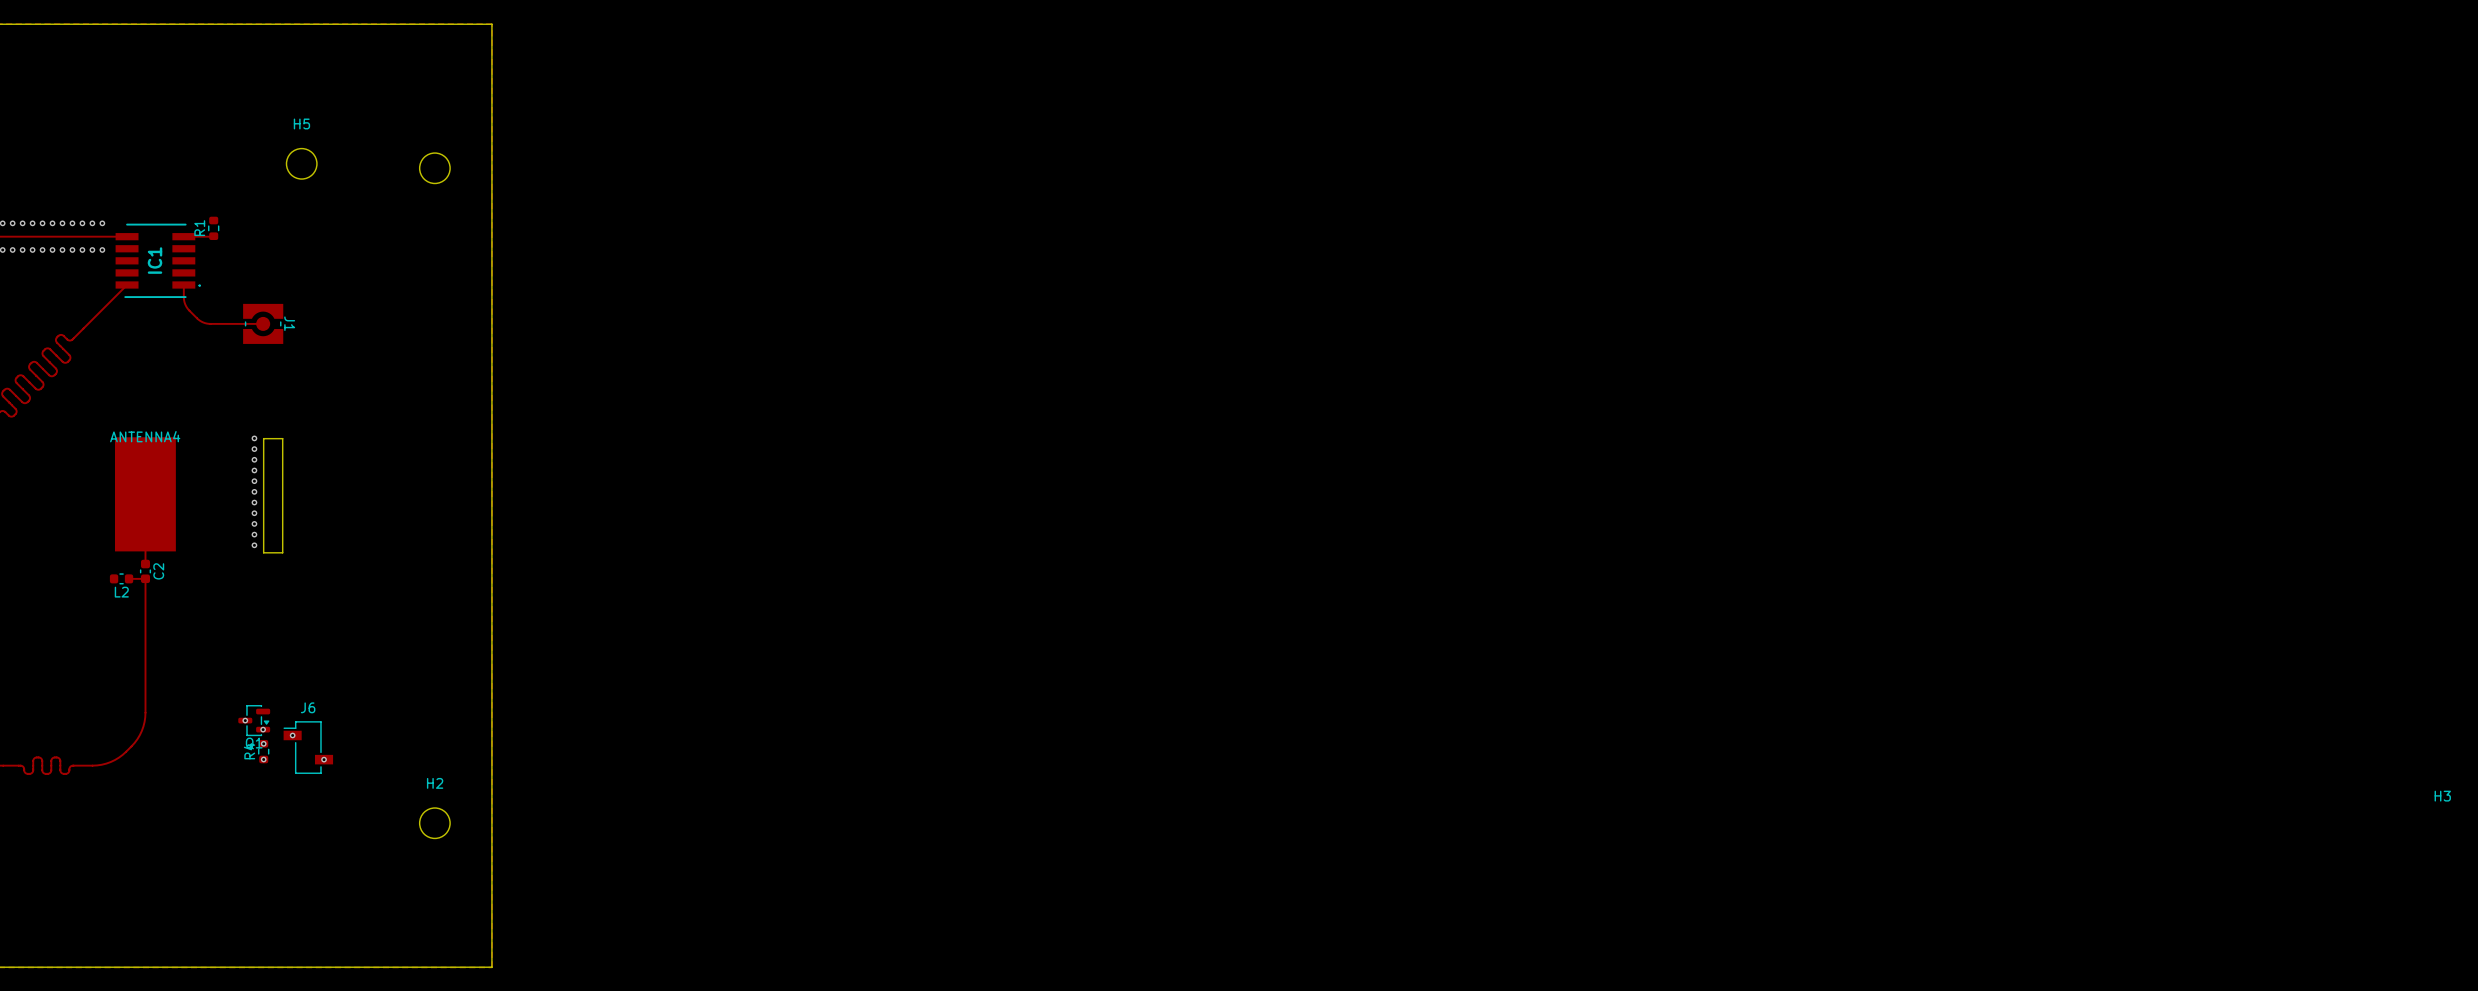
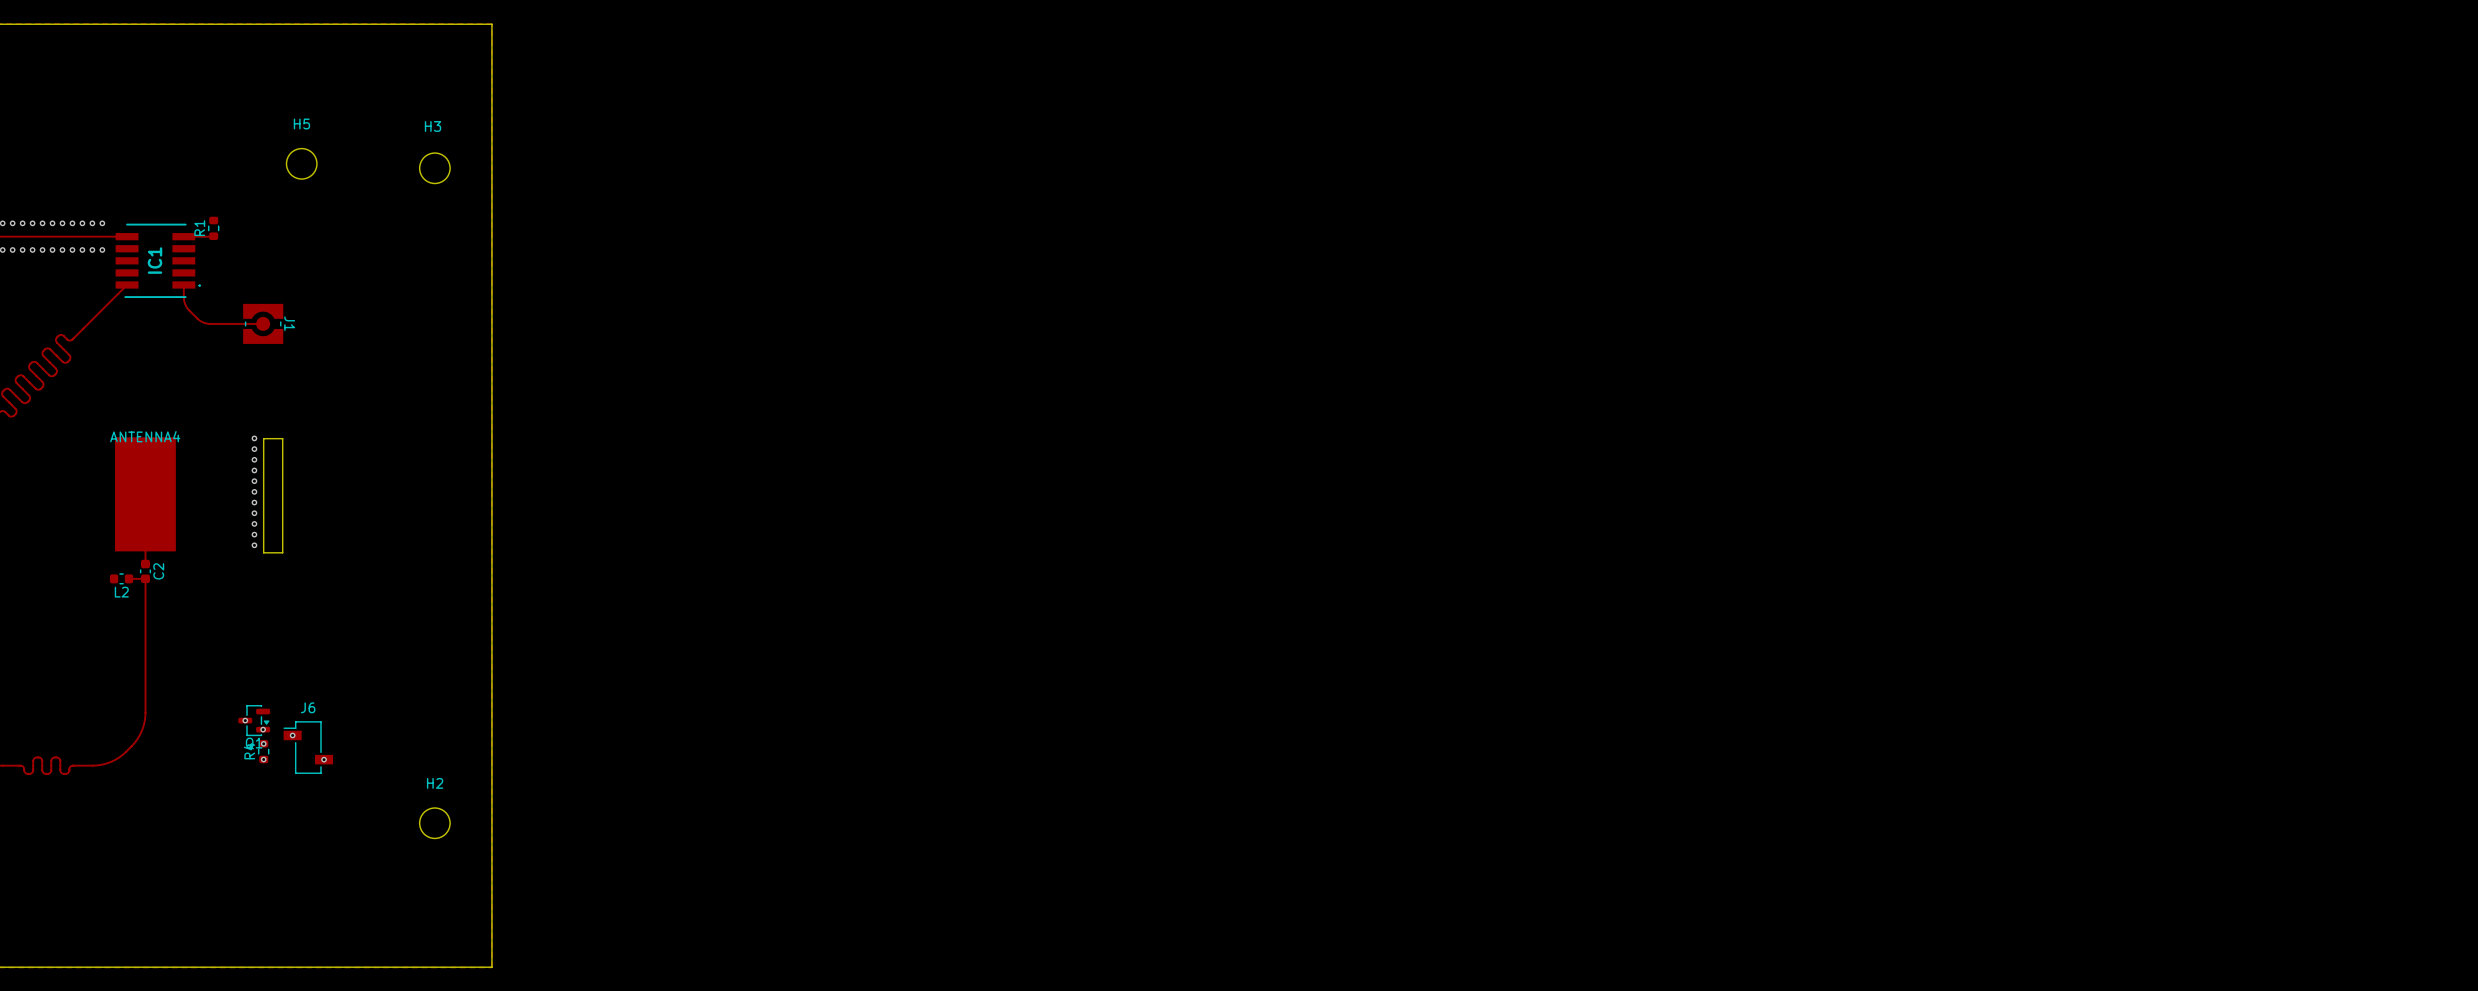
H3 name position: H3 (2442, 796) -> H3 (433, 126)

